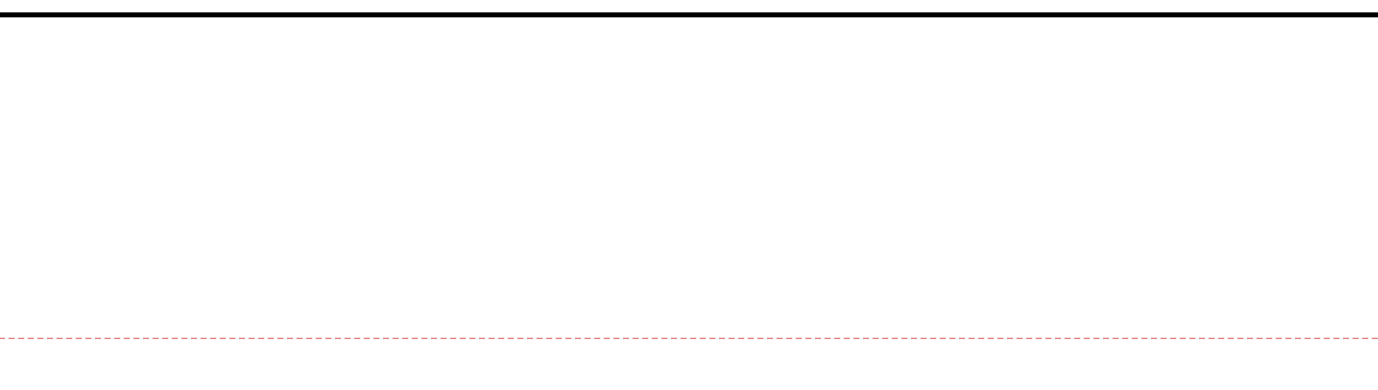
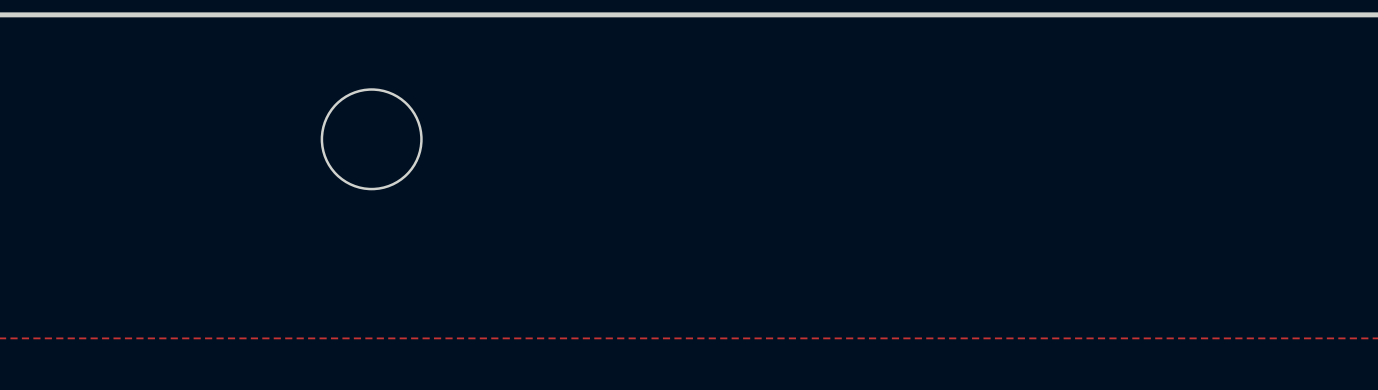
round board edge: none -> [320, 88, 423, 191]

